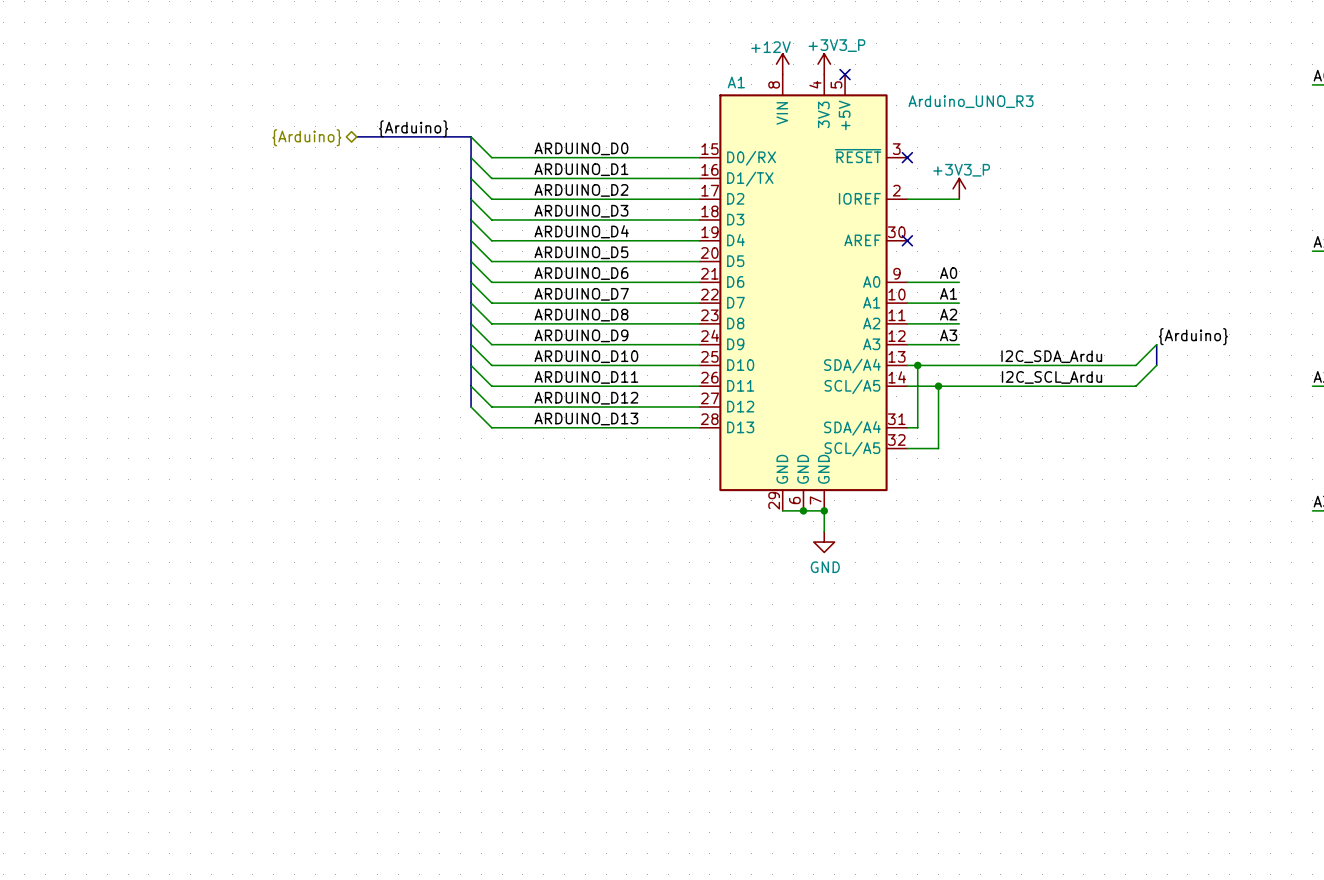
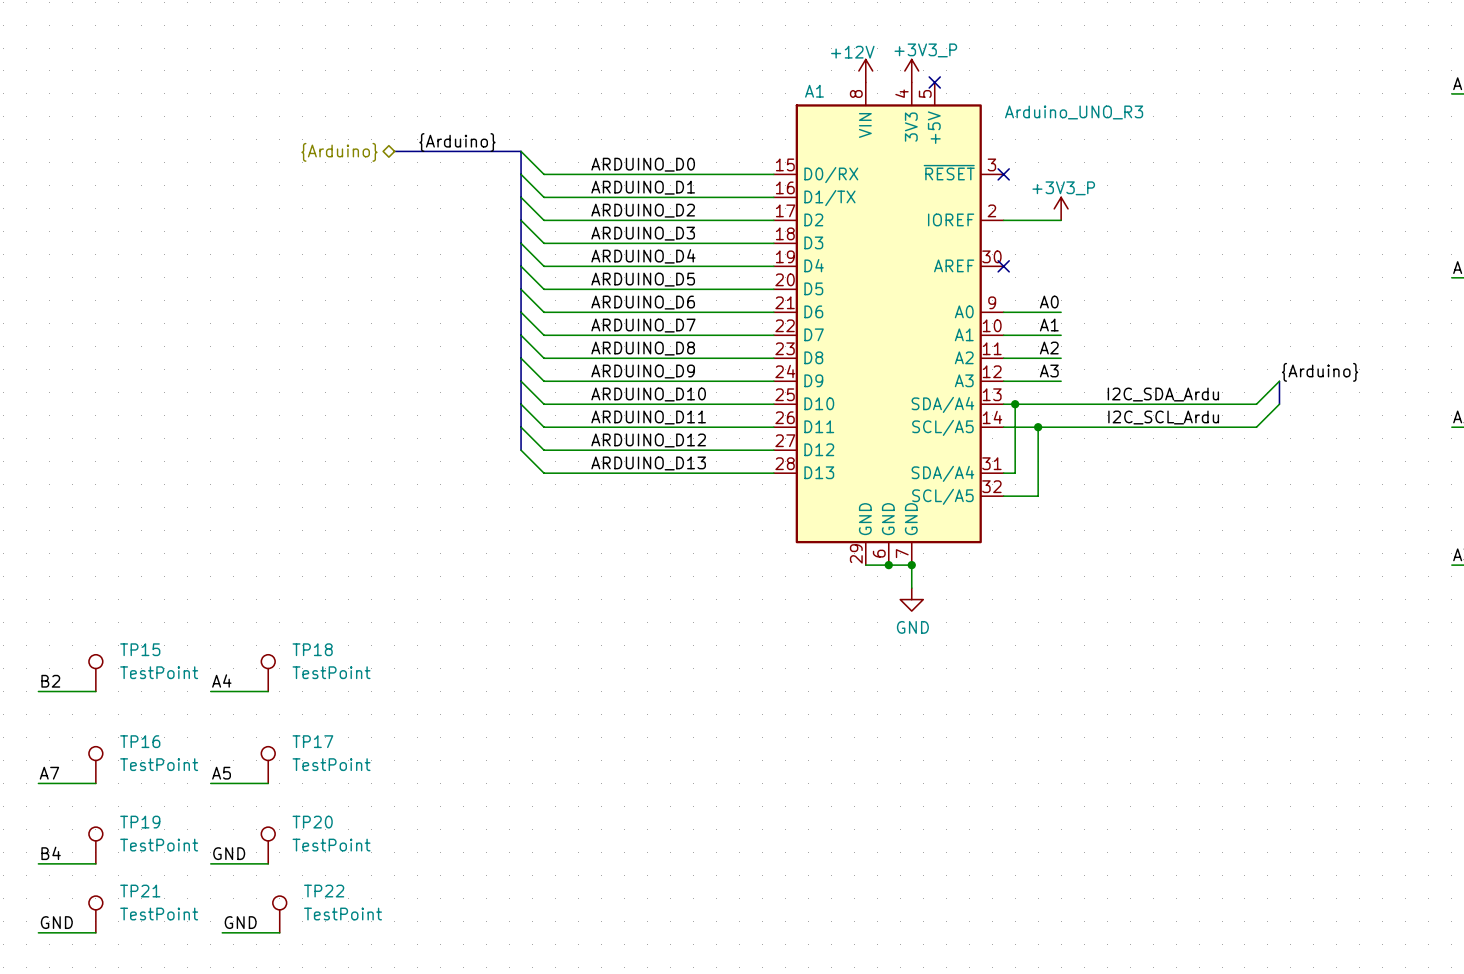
TP15: none -> TestPoint (95, 673)
TP18: none -> TestPoint (268, 673)
label: none -> B2 (50, 681)
label: none -> A4 (221, 680)
wire: none -> (38, 691) (95, 691)
wire: none -> (210, 691) (268, 691)
TP16: none -> TestPoint (95, 765)
TP17: none -> TestPoint (268, 765)
label: none -> A7 (49, 773)
label: none -> A5 (221, 773)
wire: none -> (38, 783) (95, 783)
wire: none -> (210, 783) (268, 783)
TP19: none -> TestPoint (95, 845)
TP20: none -> TestPoint (268, 845)
label: none -> B4 (51, 853)
label: none -> GND (229, 853)
wire: none -> (38, 863) (95, 863)
wire: none -> (210, 863) (268, 863)
TP21: none -> TestPoint (95, 914)
TP22: none -> TestPoint (279, 914)
label: none -> GND (56, 922)
label: none -> GND (240, 922)
wire: none -> (38, 932) (95, 932)
wire: none -> (222, 932) (279, 932)

